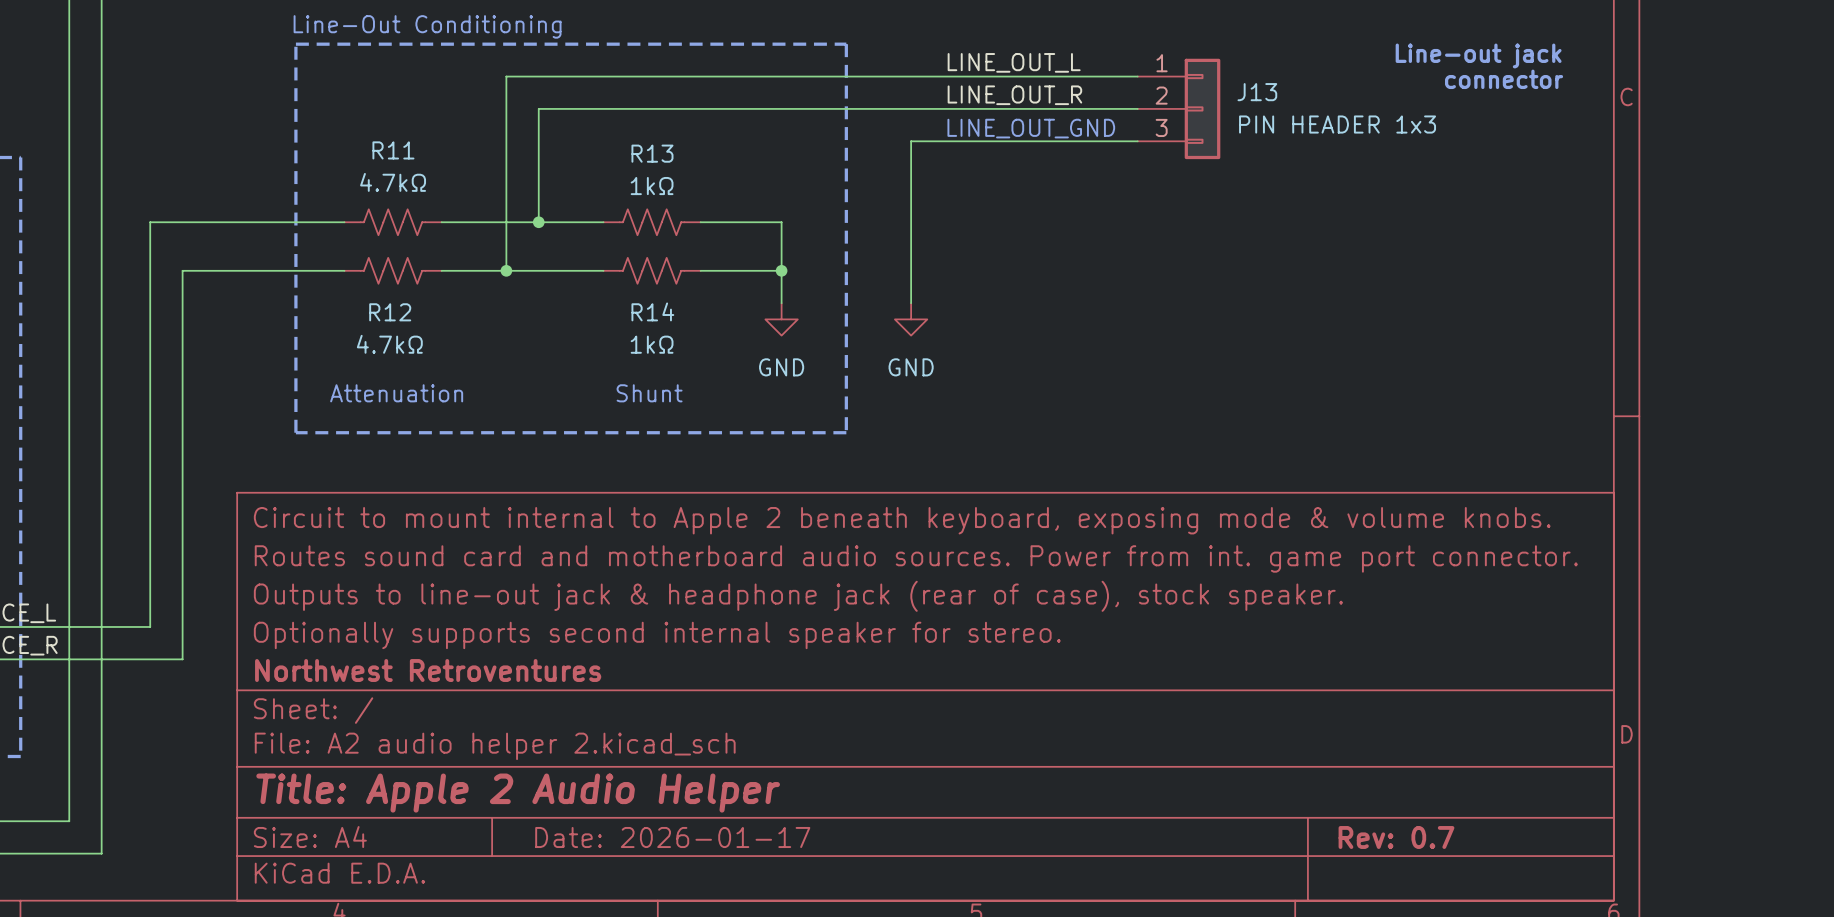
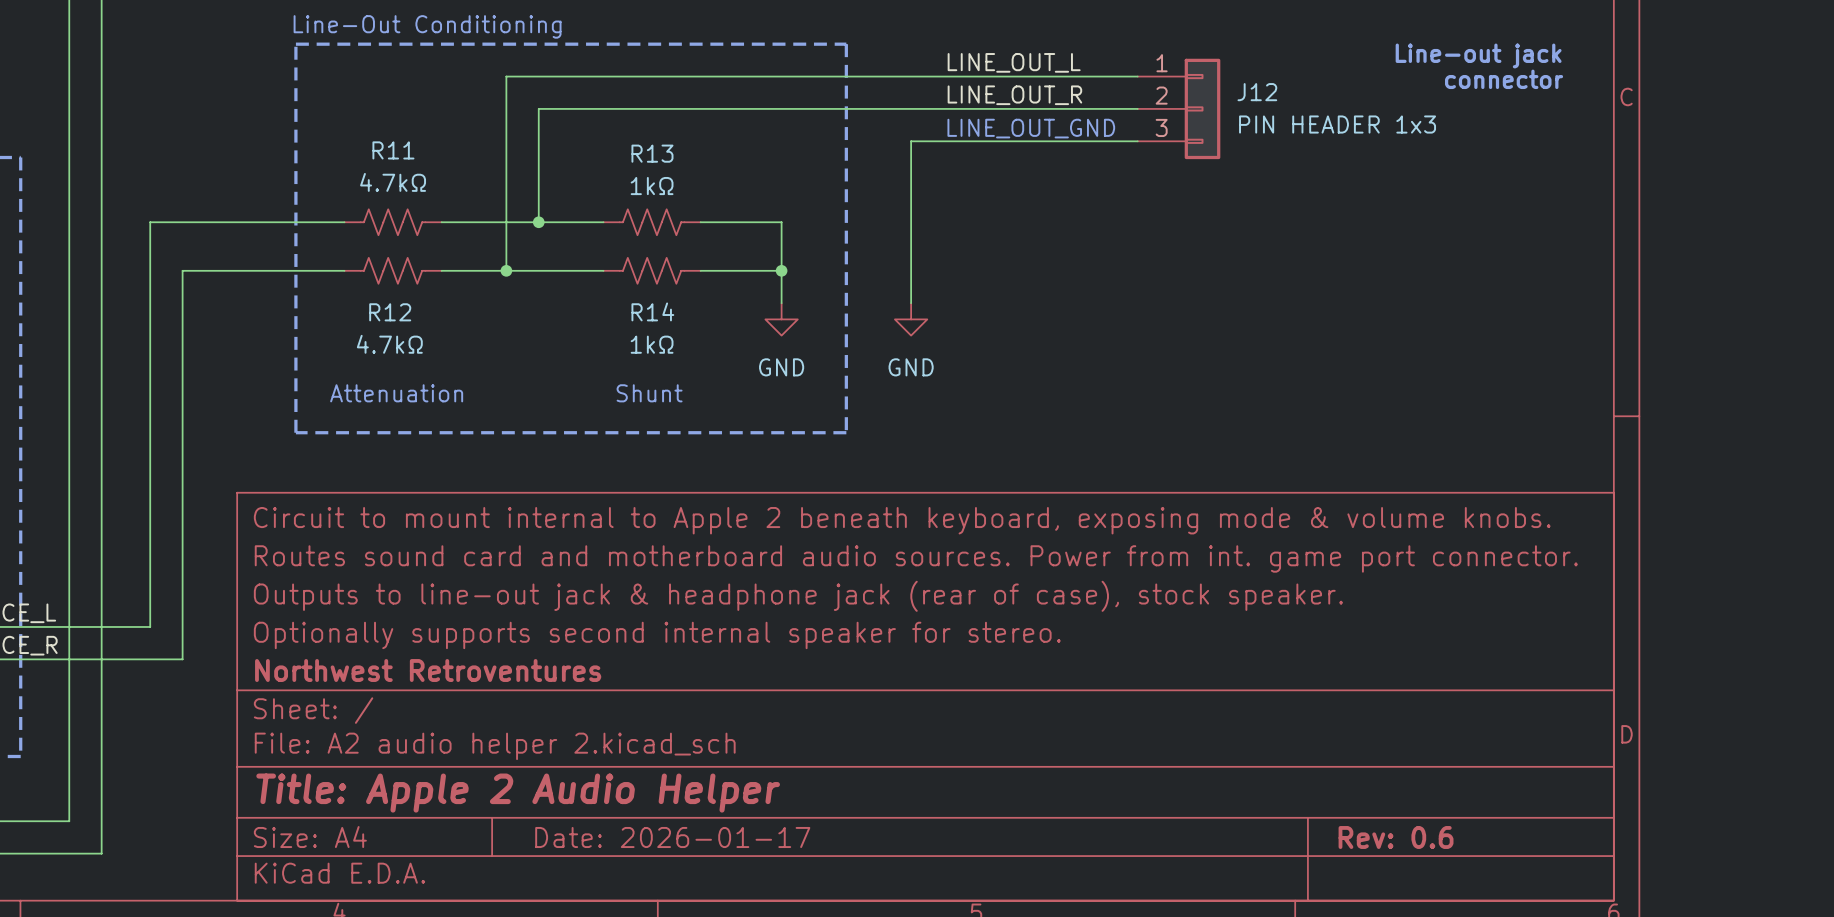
J13 name: J13 (1257, 92) -> J12 (1257, 92)
title block: Rev: 0.7 (1396, 837) -> Rev: 0.6 (1396, 837)

